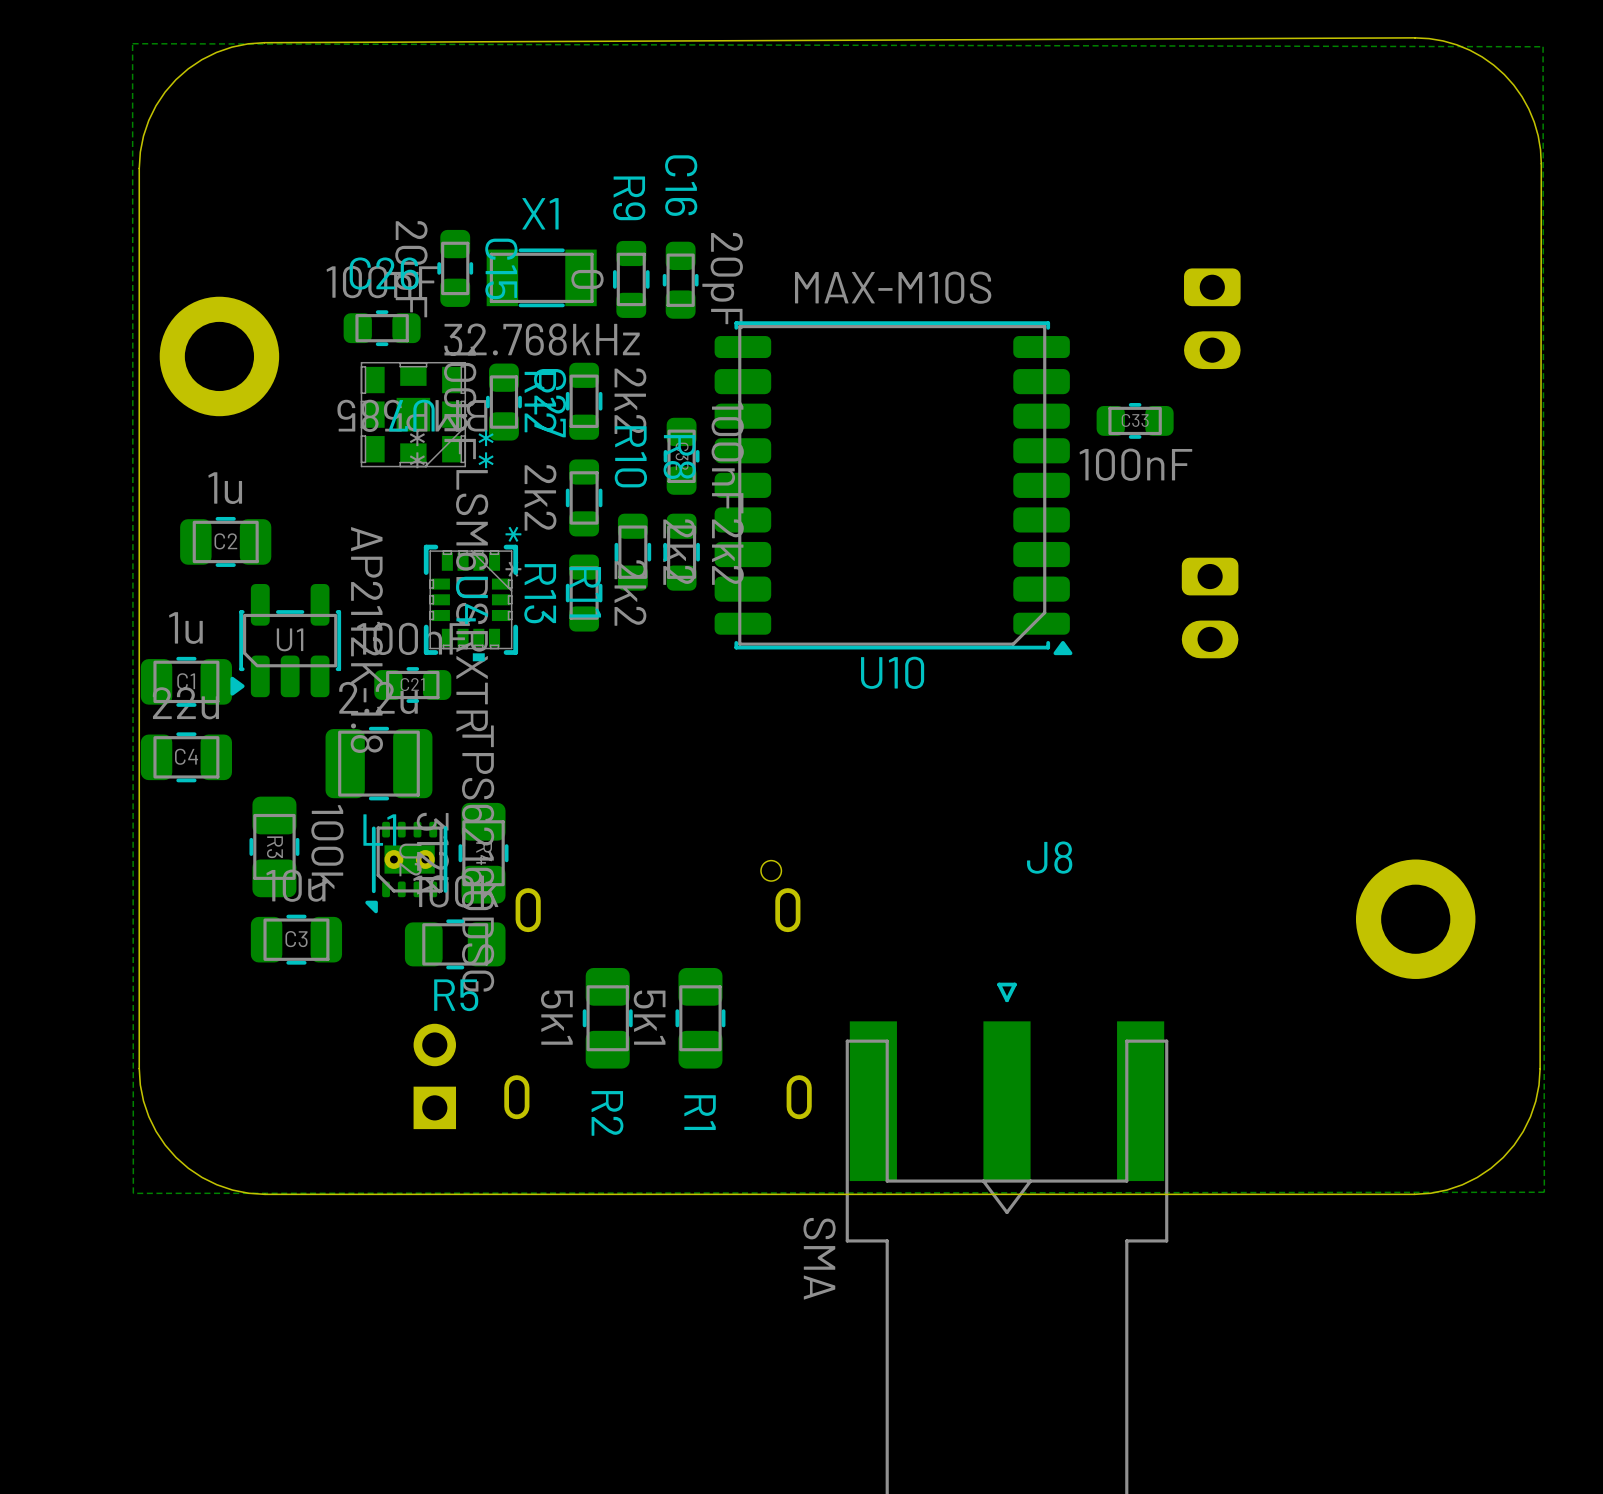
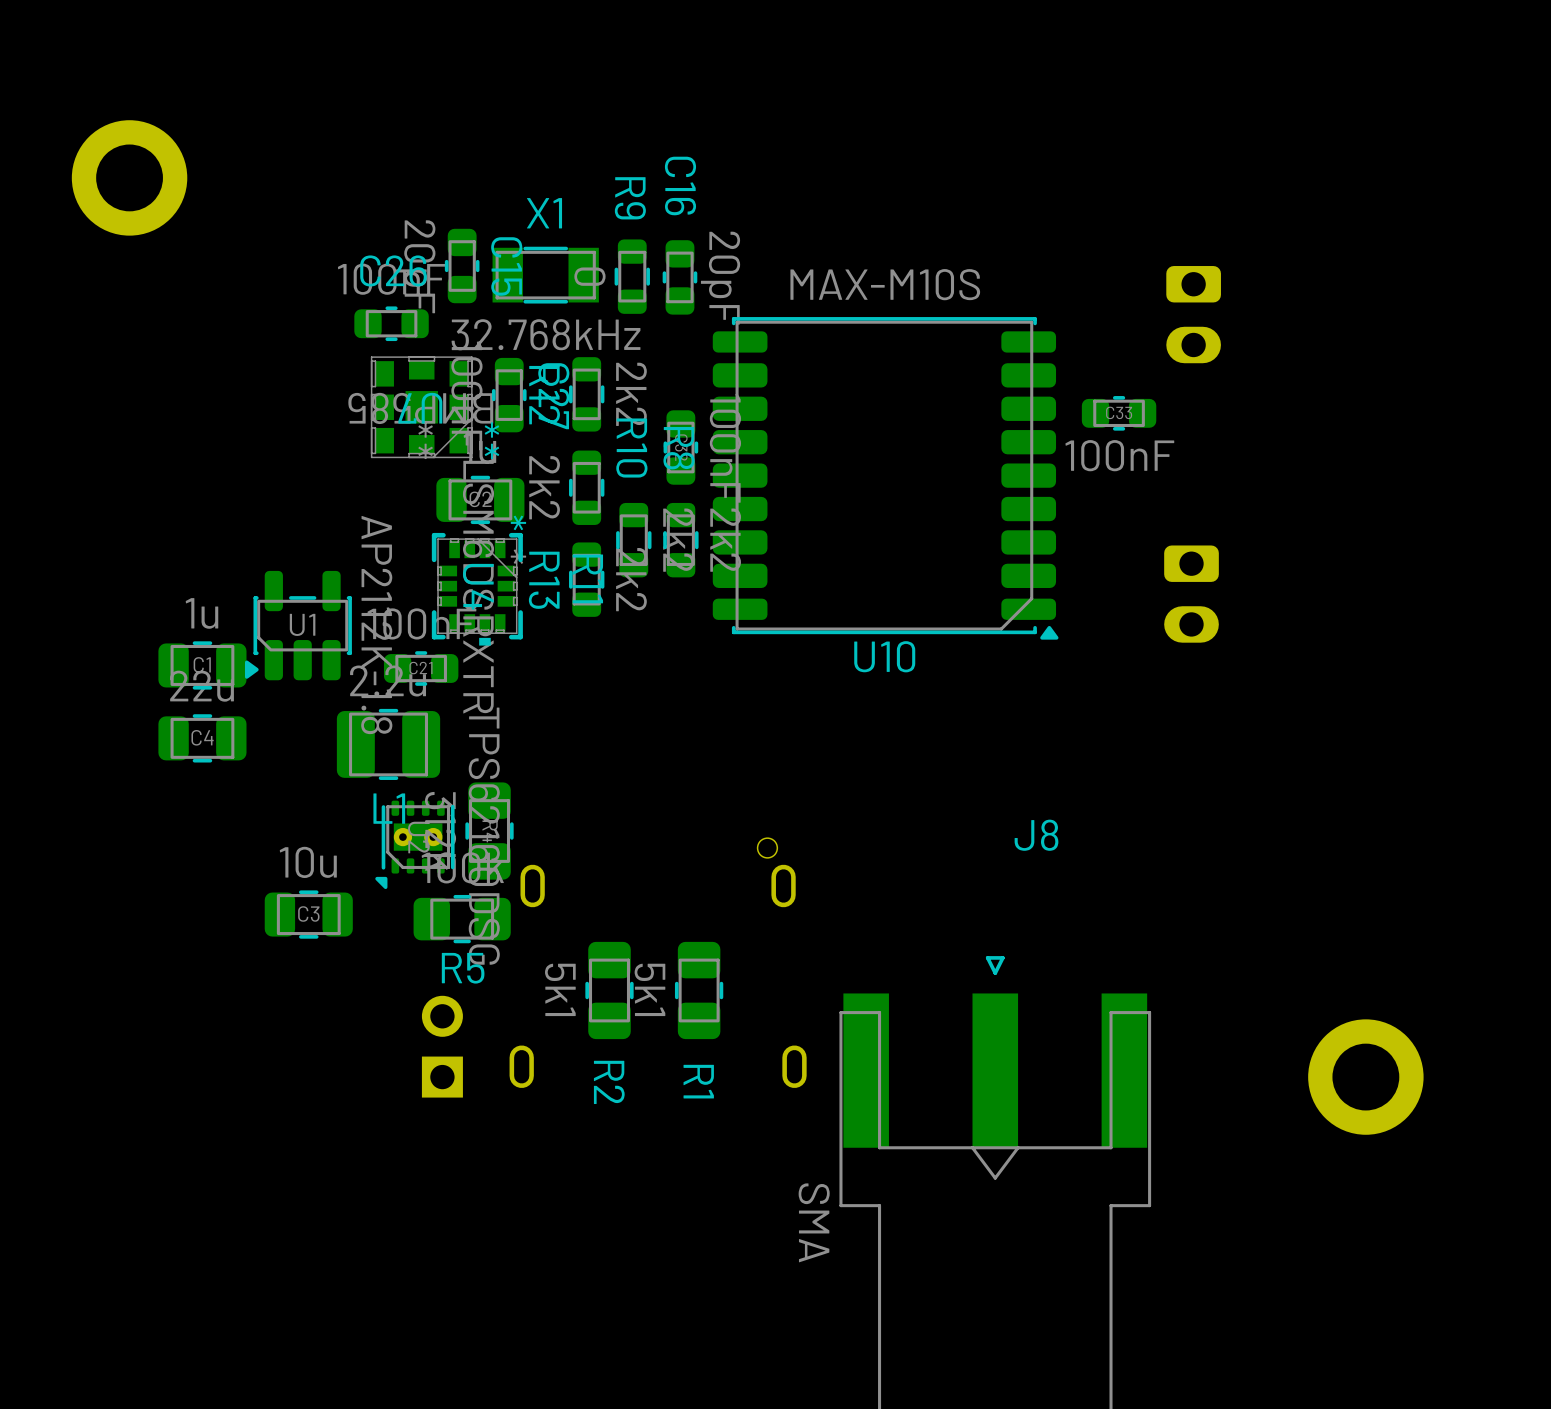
board edge: (1415, 37) (264, 42) (232, 47) (216, 52) (201, 59) (175, 79) (165, 92) (148, 120) (140, 152) (139, 168) (139, 1068) (140, 1084) (148, 1116) (156, 1131) (176, 1157) (188, 1168) (216, 1184) (232, 1190) (265, 1194) (1414, 1194) (1446, 1190) (1462, 1184) (1490, 1168) (1503, 1157) (1514, 1145) (1530, 1116) (1535, 1101) (1540, 1068) (1540, 149) (1538, 135) (1528, 109) (1513, 85) (1493, 65) (1469, 50) (1456, 44) (1429, 38) (1415, 37) -> none
zone outline: (132, 43) (133, 1193) (1544, 1192) (1543, 46) (132, 43) -> none
part position: (219, 356) -> (129, 177)
C2 position: (225, 541) -> (480, 499)
R3: 100k (274, 846) -> none
part position: (1415, 919) -> (1365, 1077)

